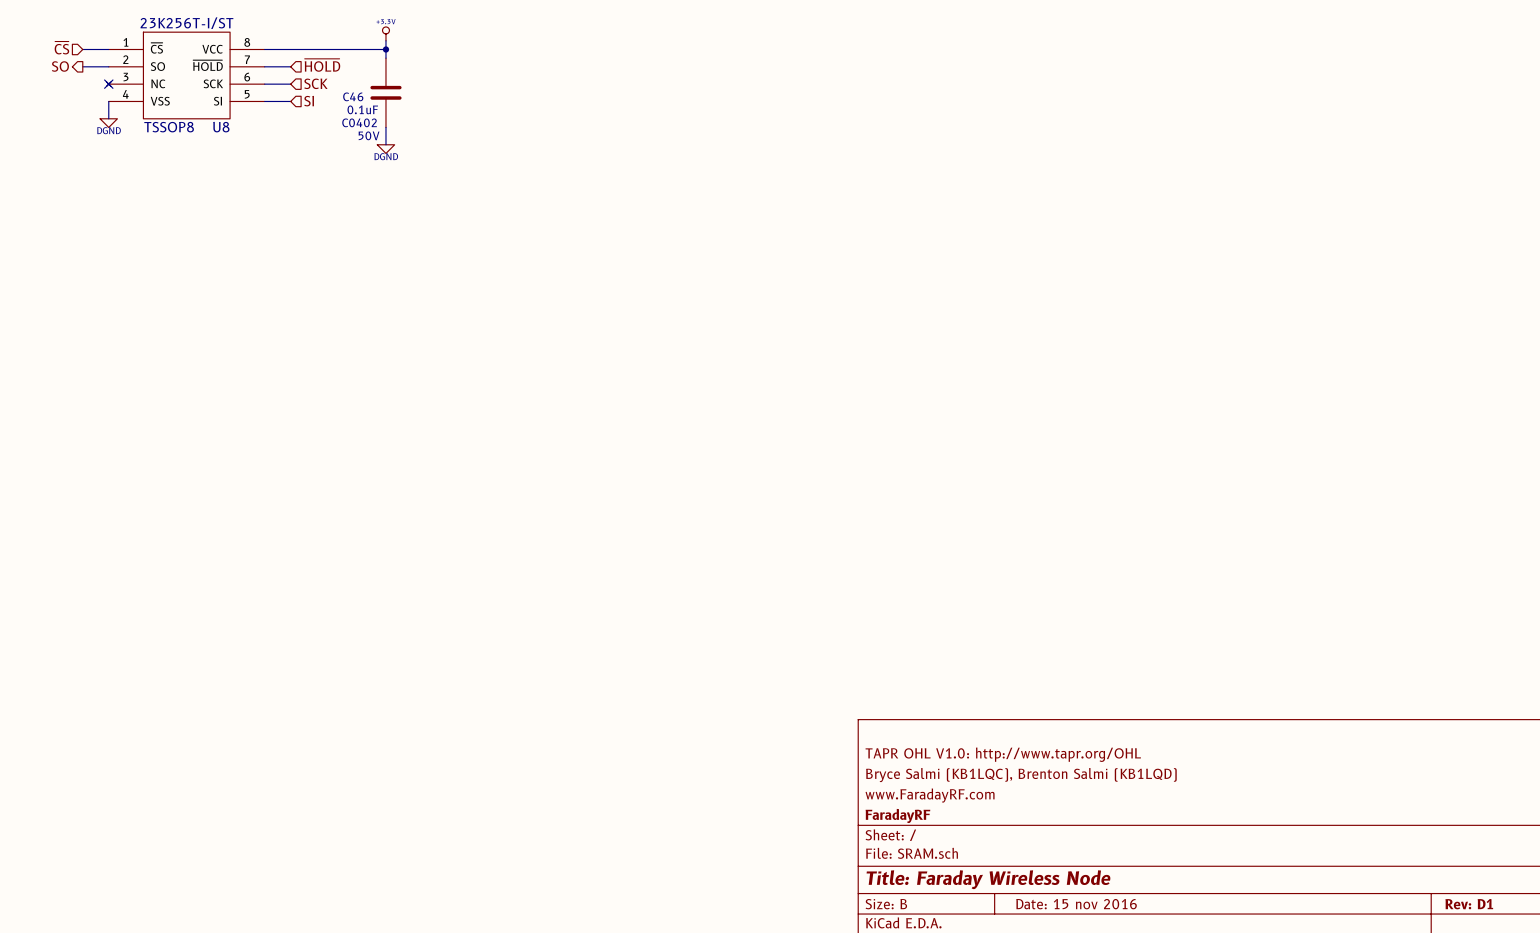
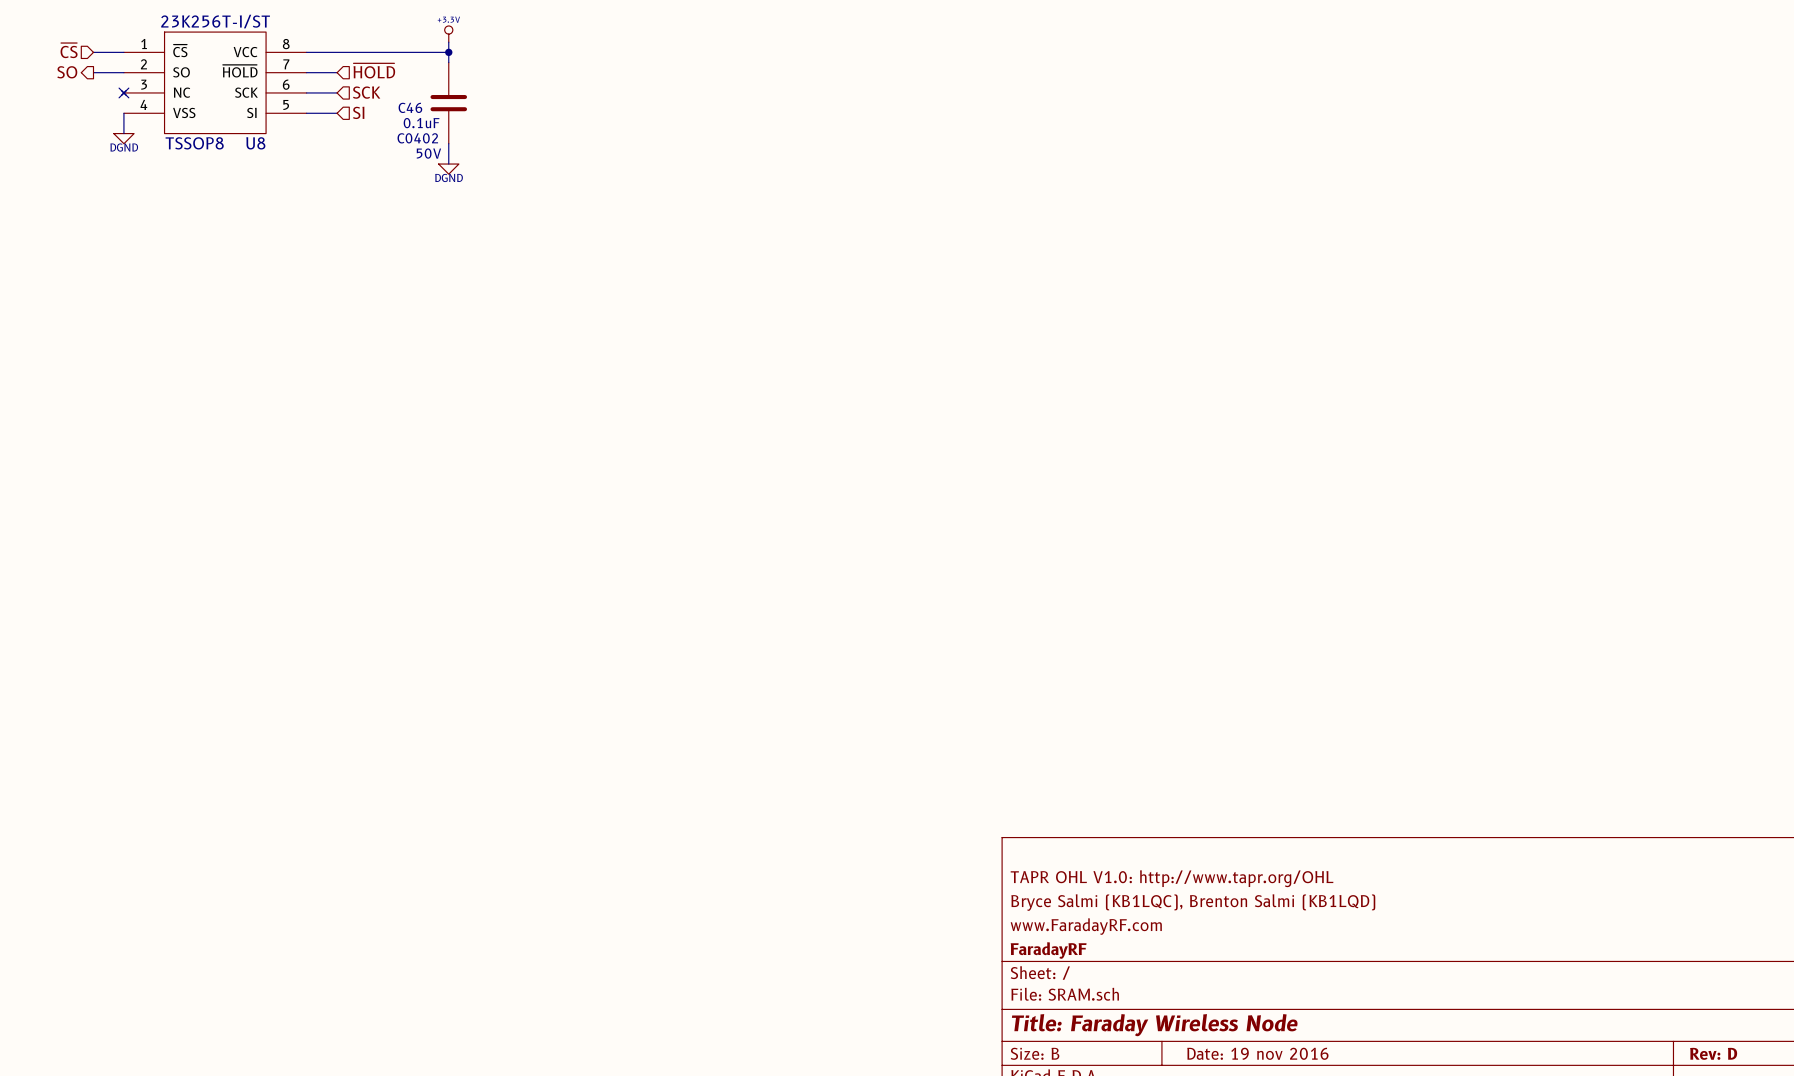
title block: Date: 15 nov 2016 (1076, 904) -> Date: 19 nov 2016 (1257, 1053)
title block: Rev: D1 (1469, 904) -> Rev: D (1713, 1053)

